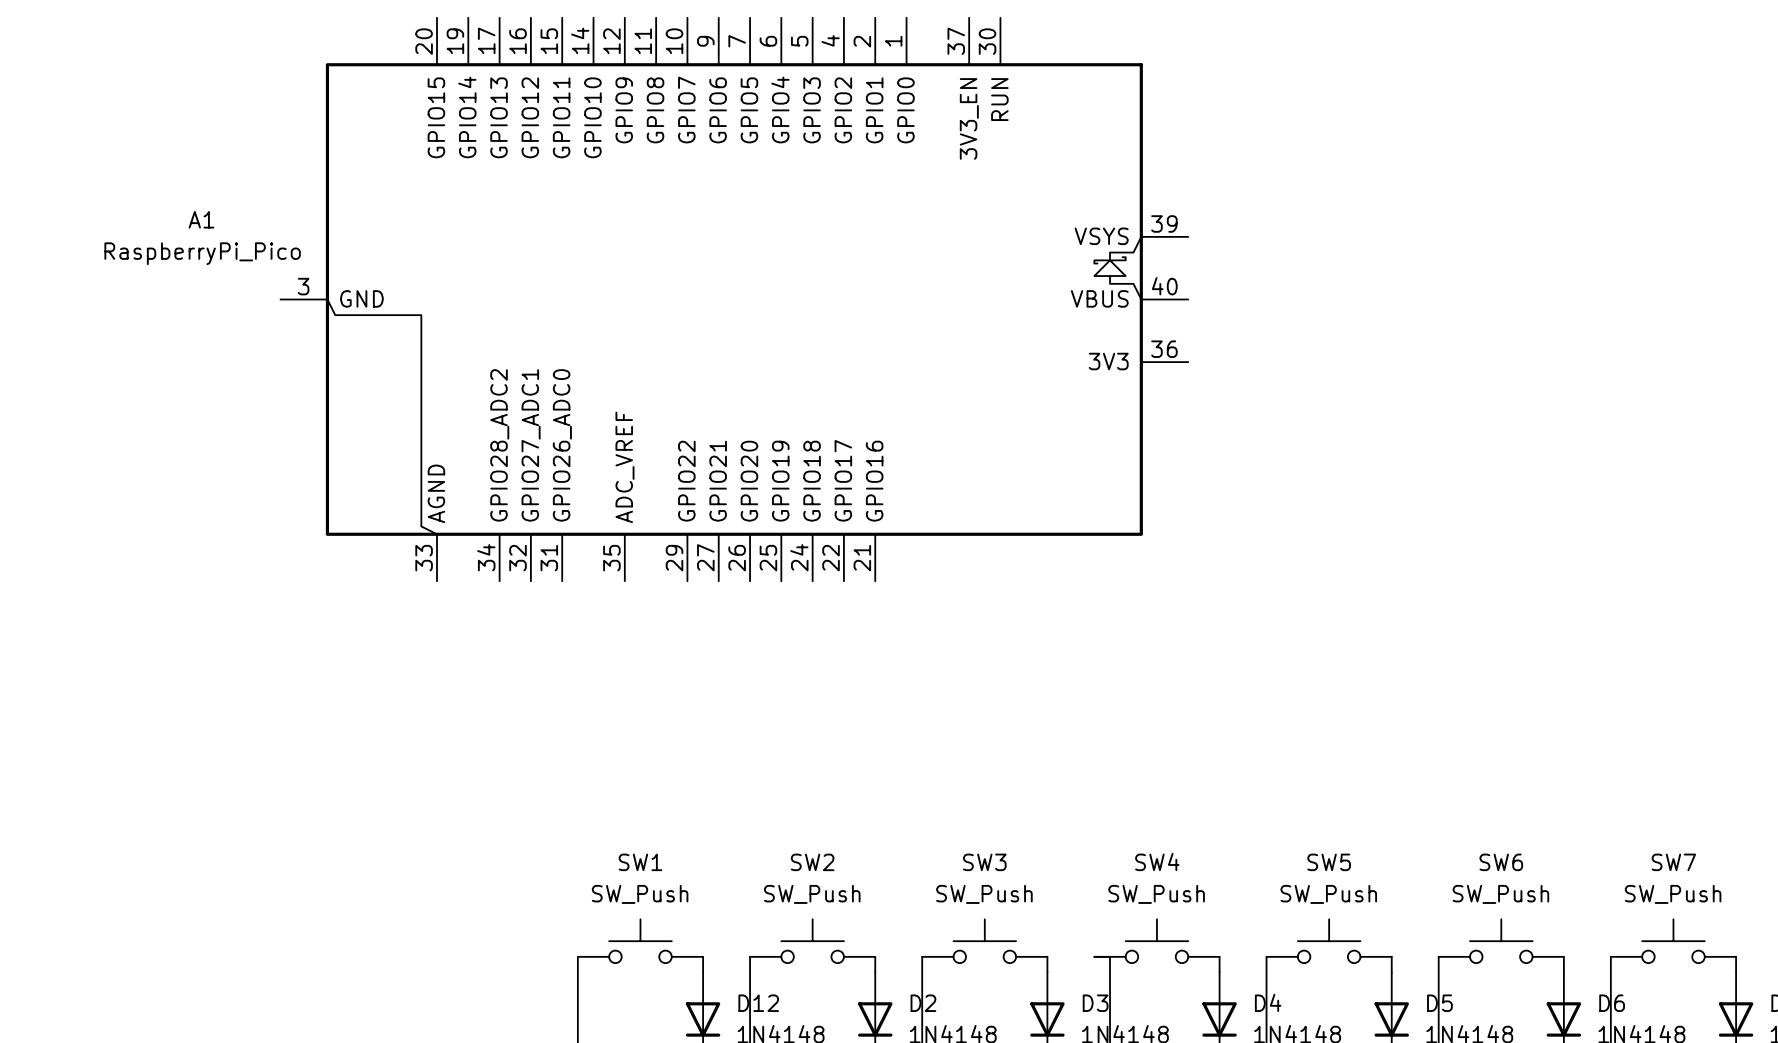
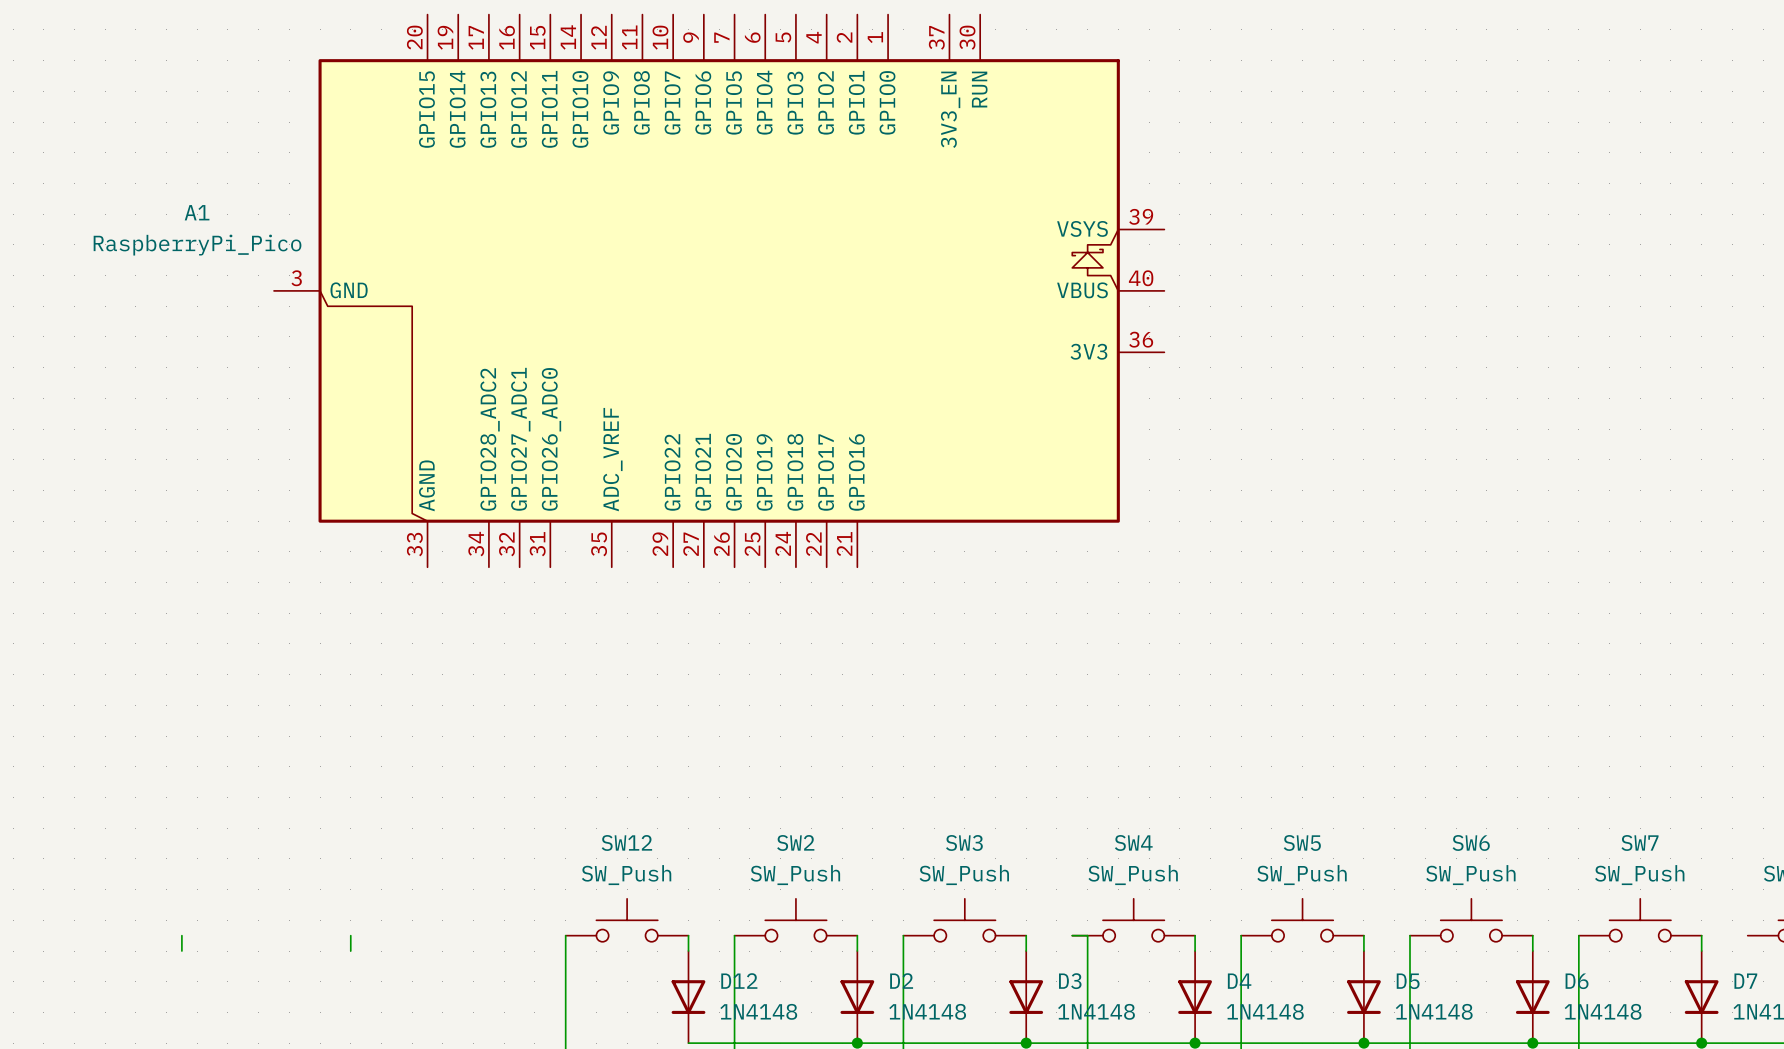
SW1 name: SW1 (640, 862) -> SW12 (626, 842)
wire: none -> (181, 935) (181, 951)
wire: none -> (350, 935) (350, 951)

